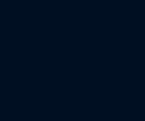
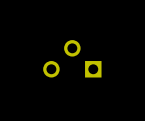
part: none -> (72, 58)

